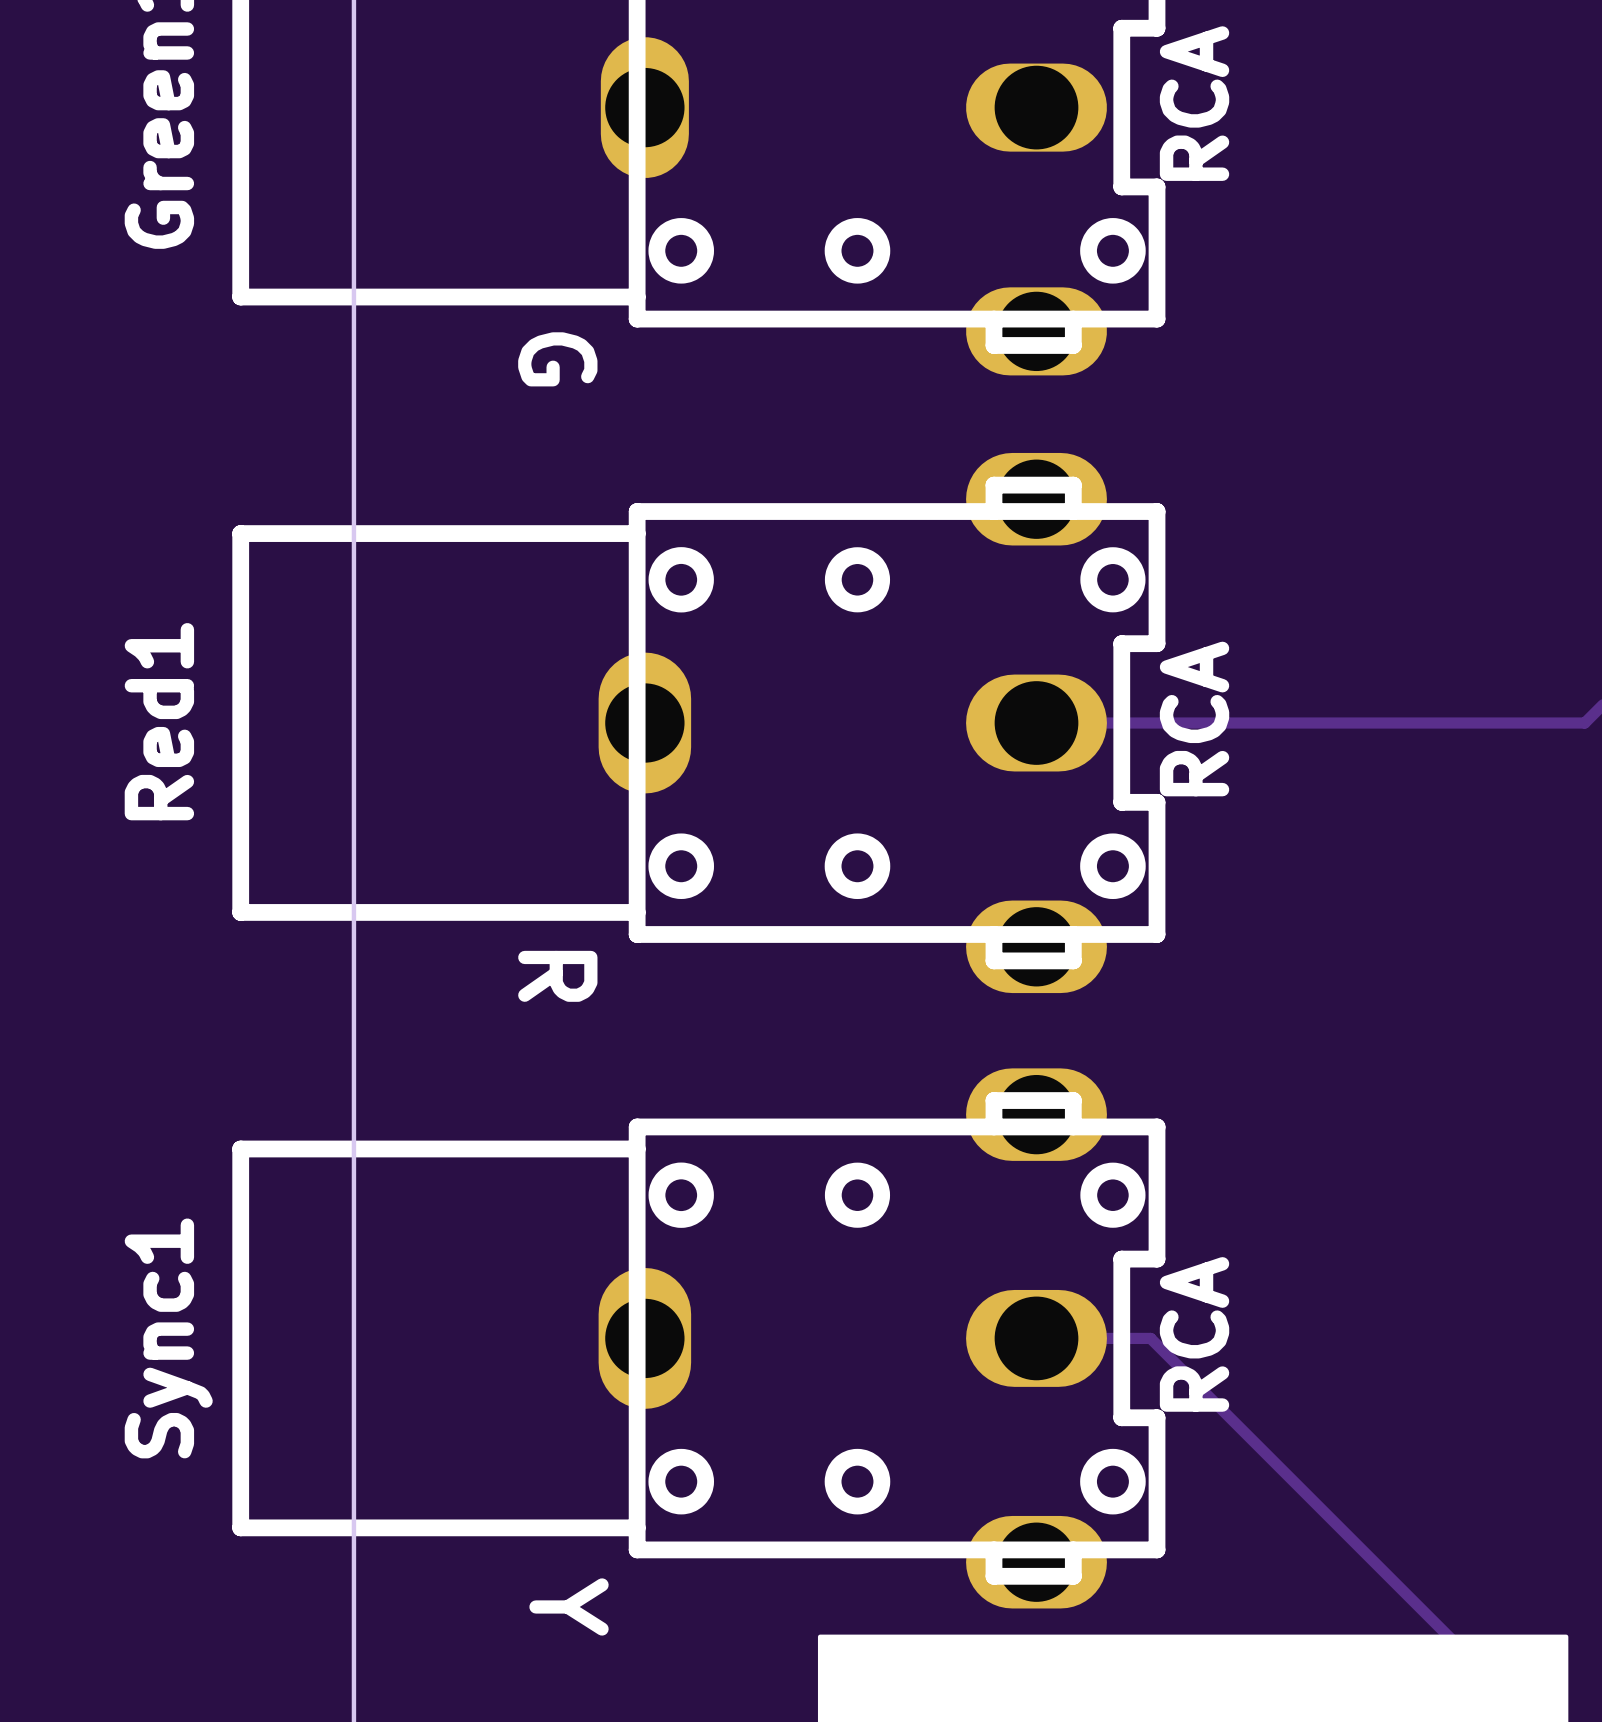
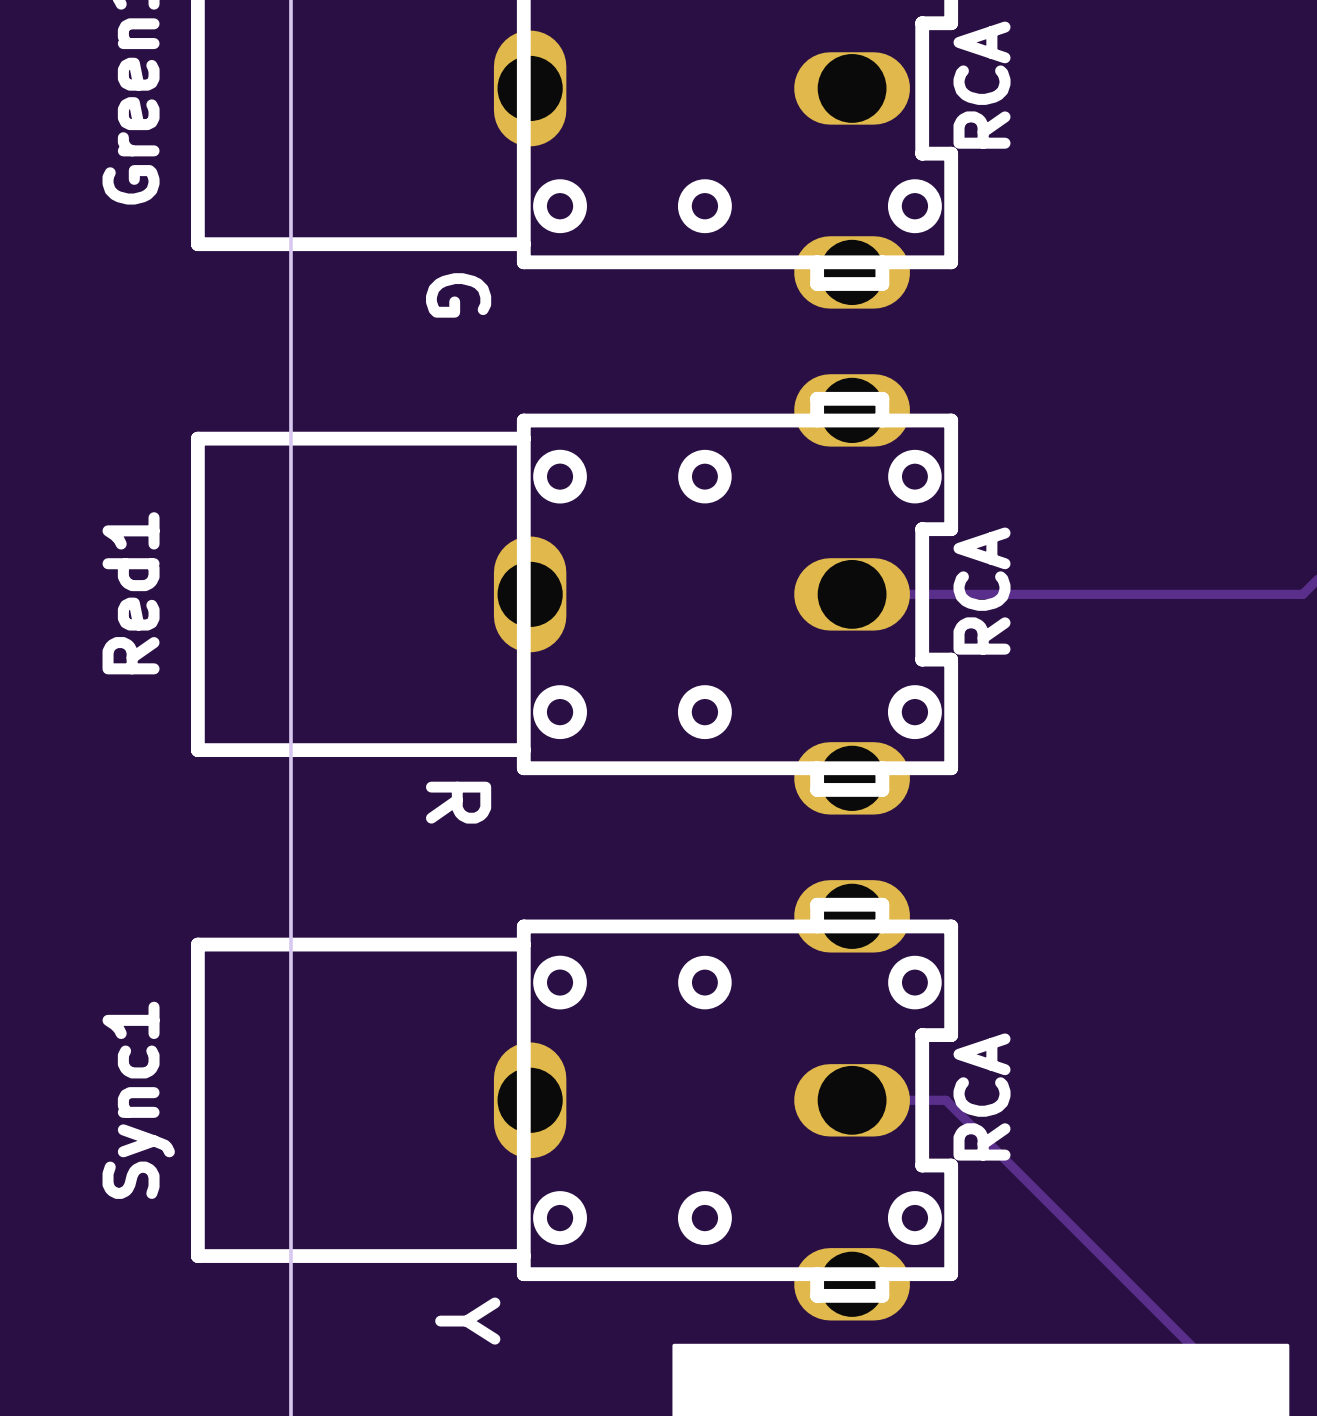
Red1 footprint: [232, 452, 1166, 994] -> [190, 374, 959, 815]
Sync1 footprint: [232, 1068, 1166, 1609] -> [190, 880, 959, 1321]

